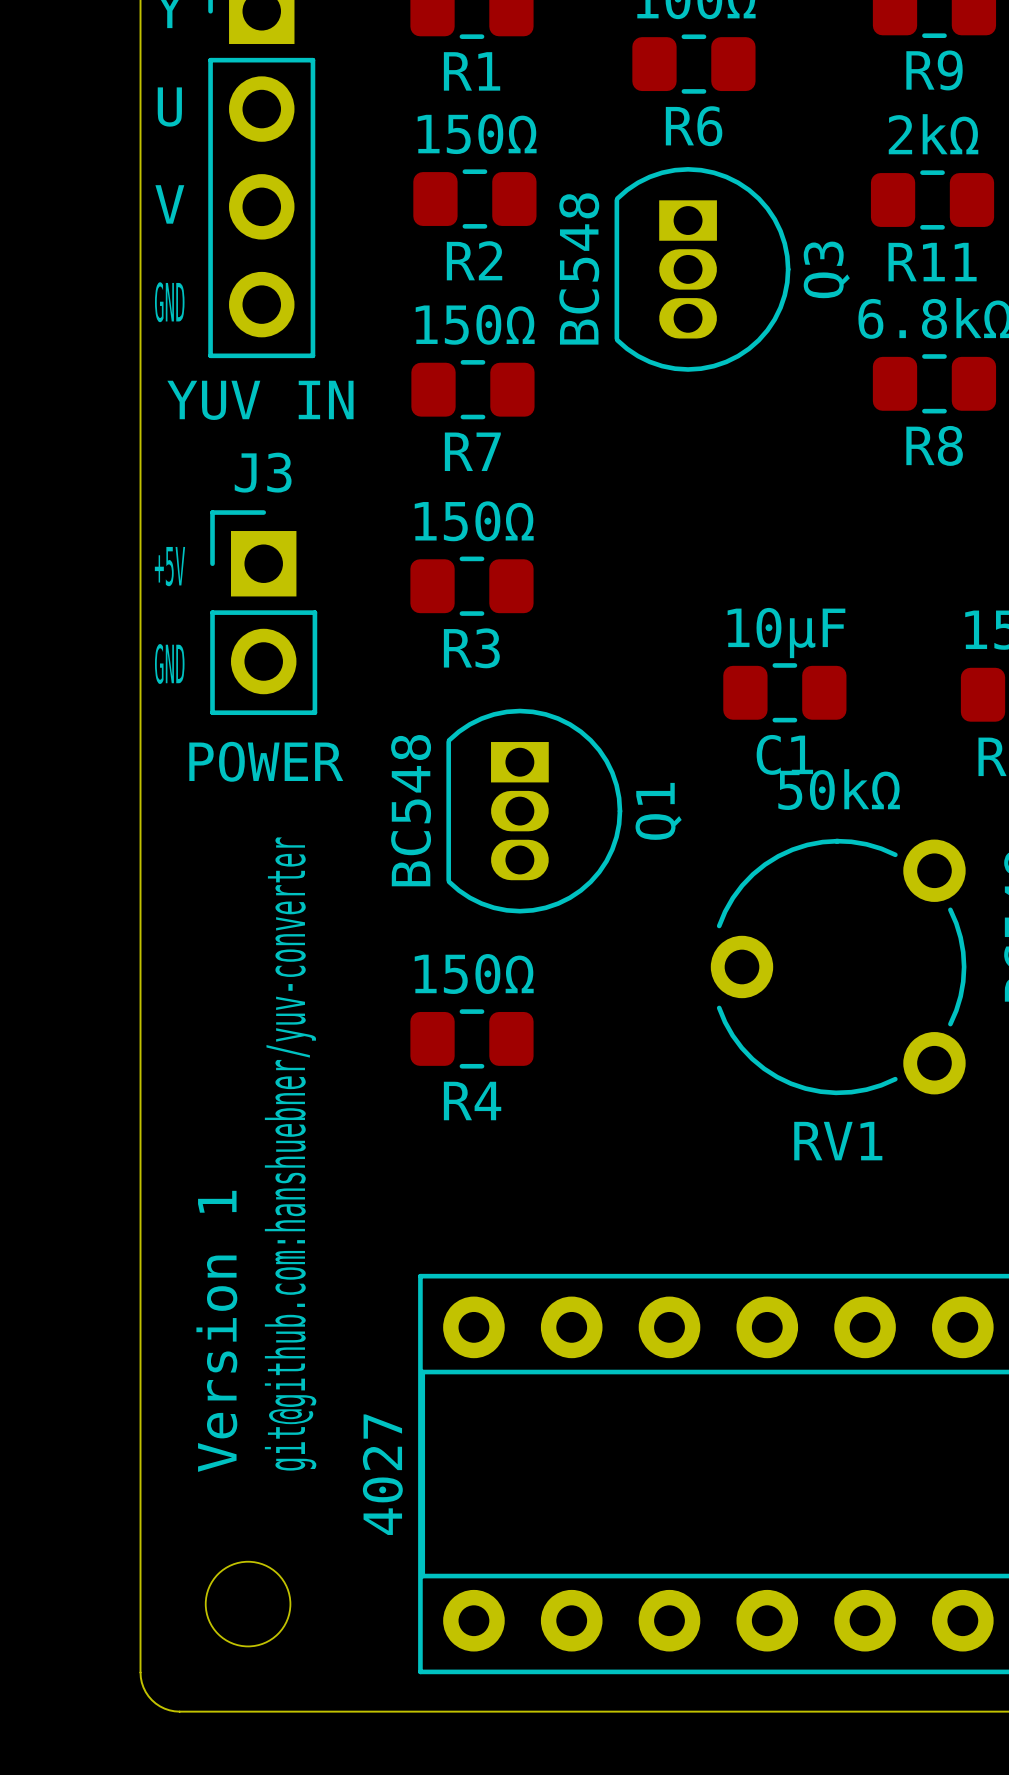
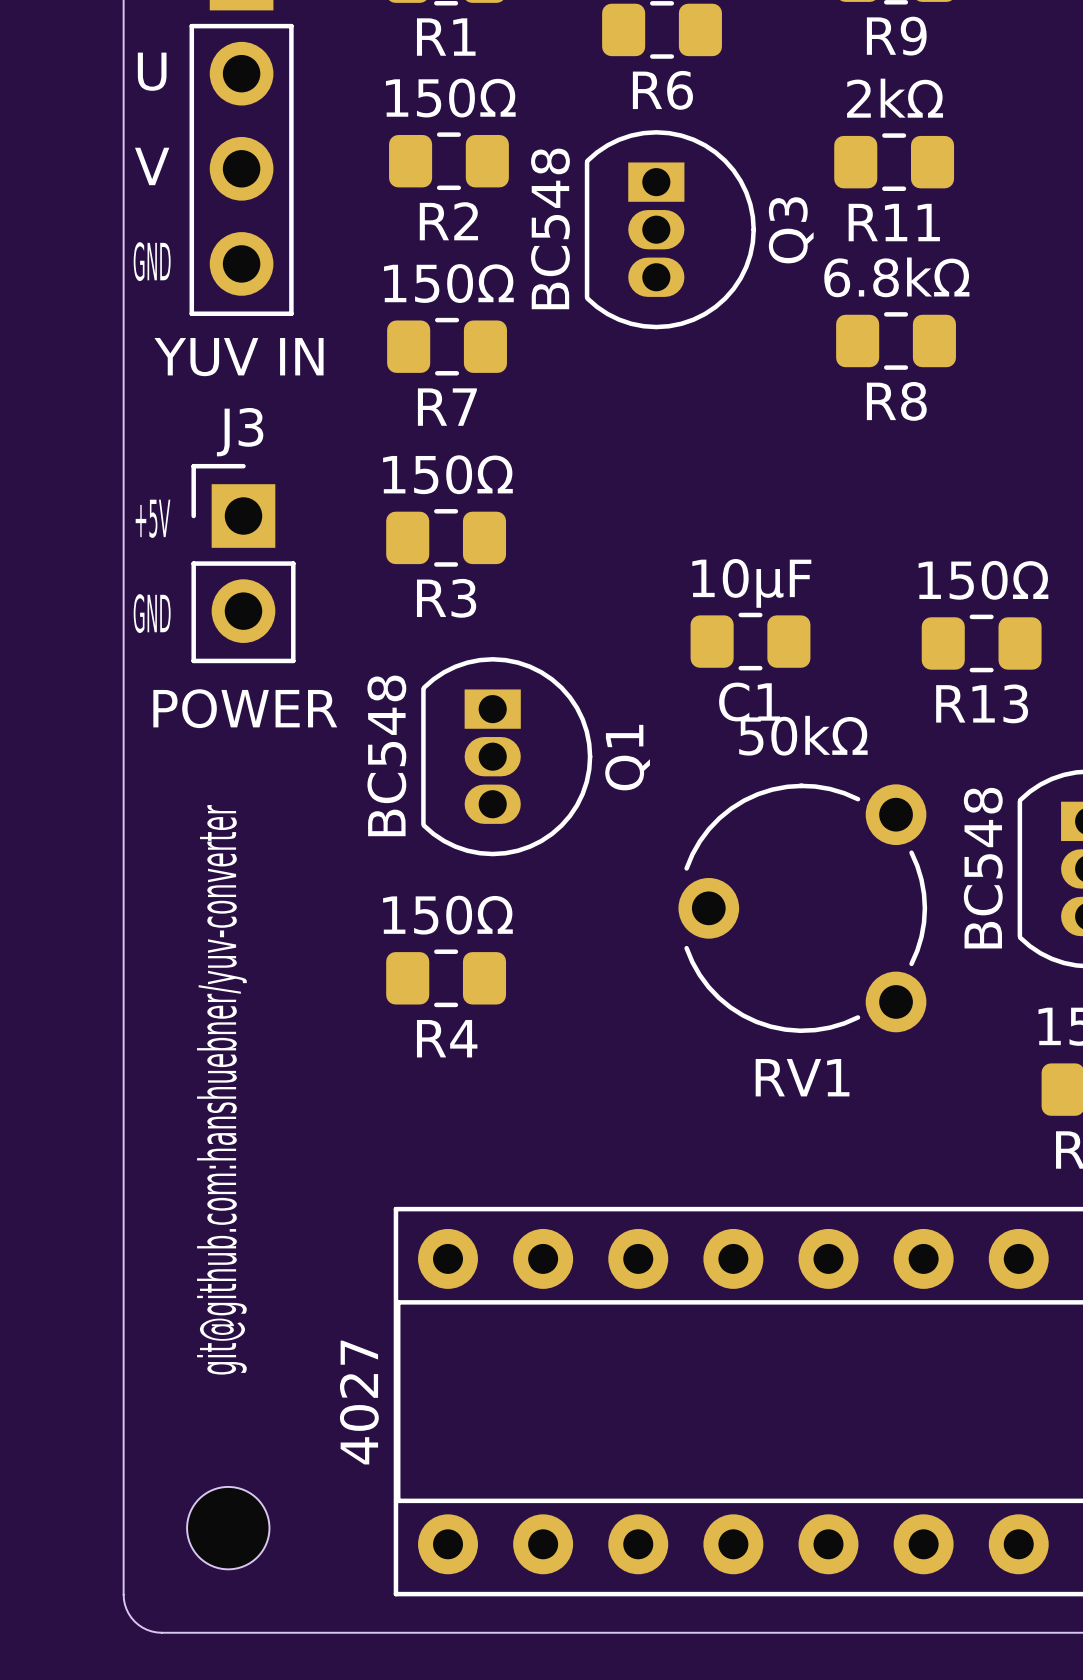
text position: git@github.com:hanshuebner/yuv-converter (290, 1154) -> git@github.com:hanshuebner/yuv-converter (221, 1089)
text: Version 1 (216, 1331) -> none

